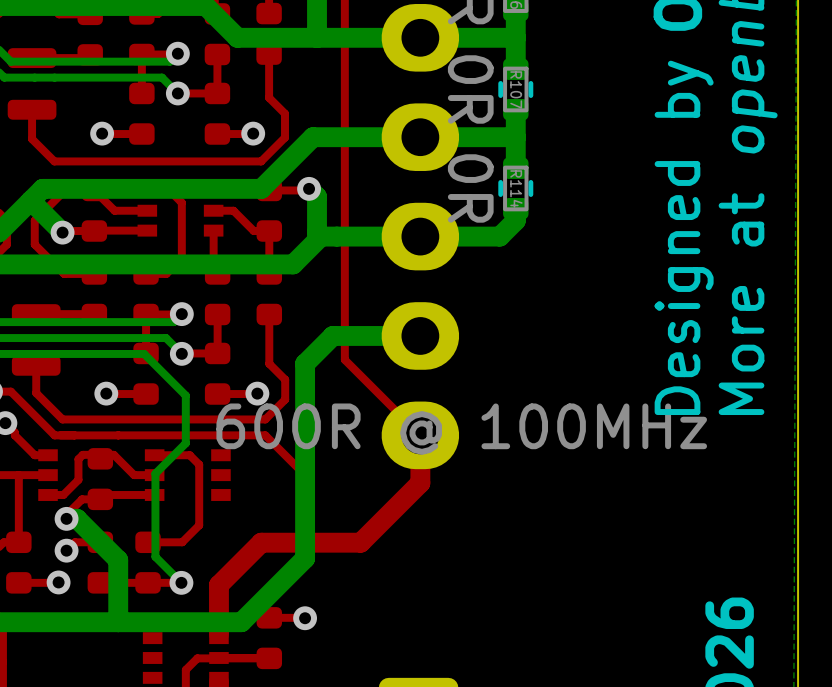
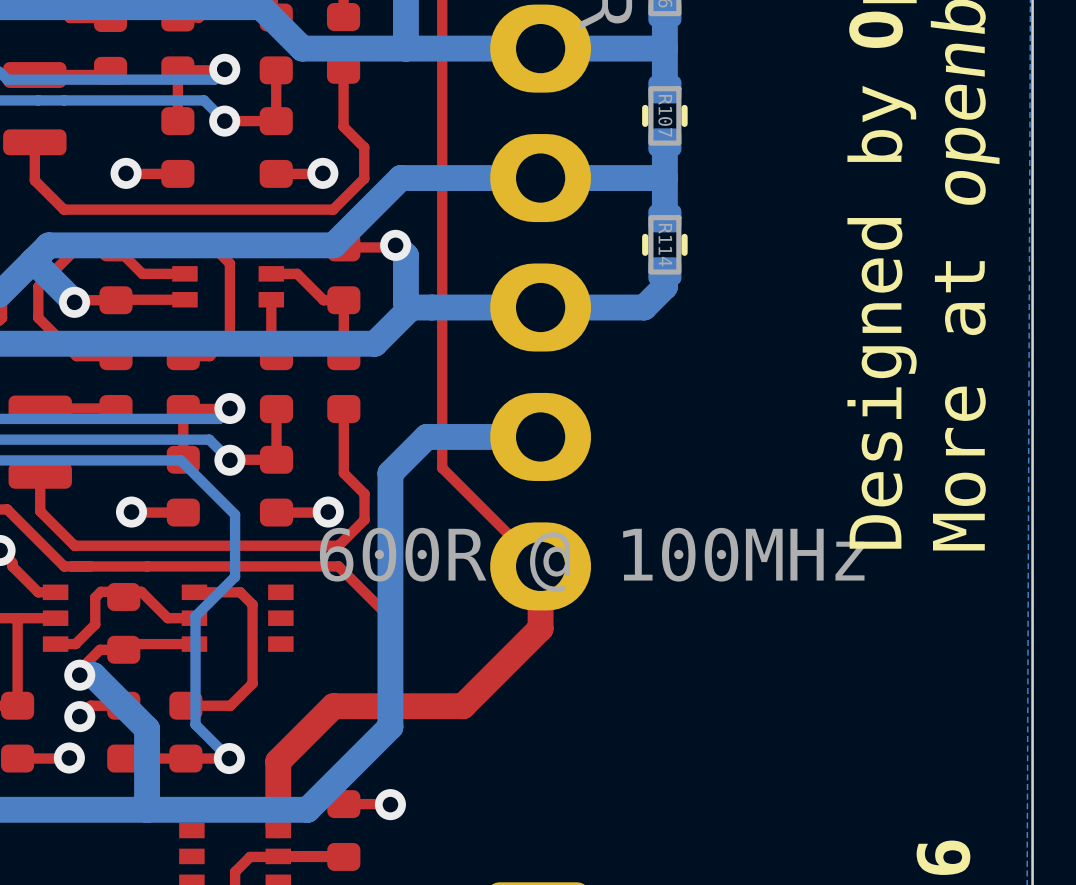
R107 value: 0R (470, 89) -> none
R114 value: 0R (470, 188) -> none

